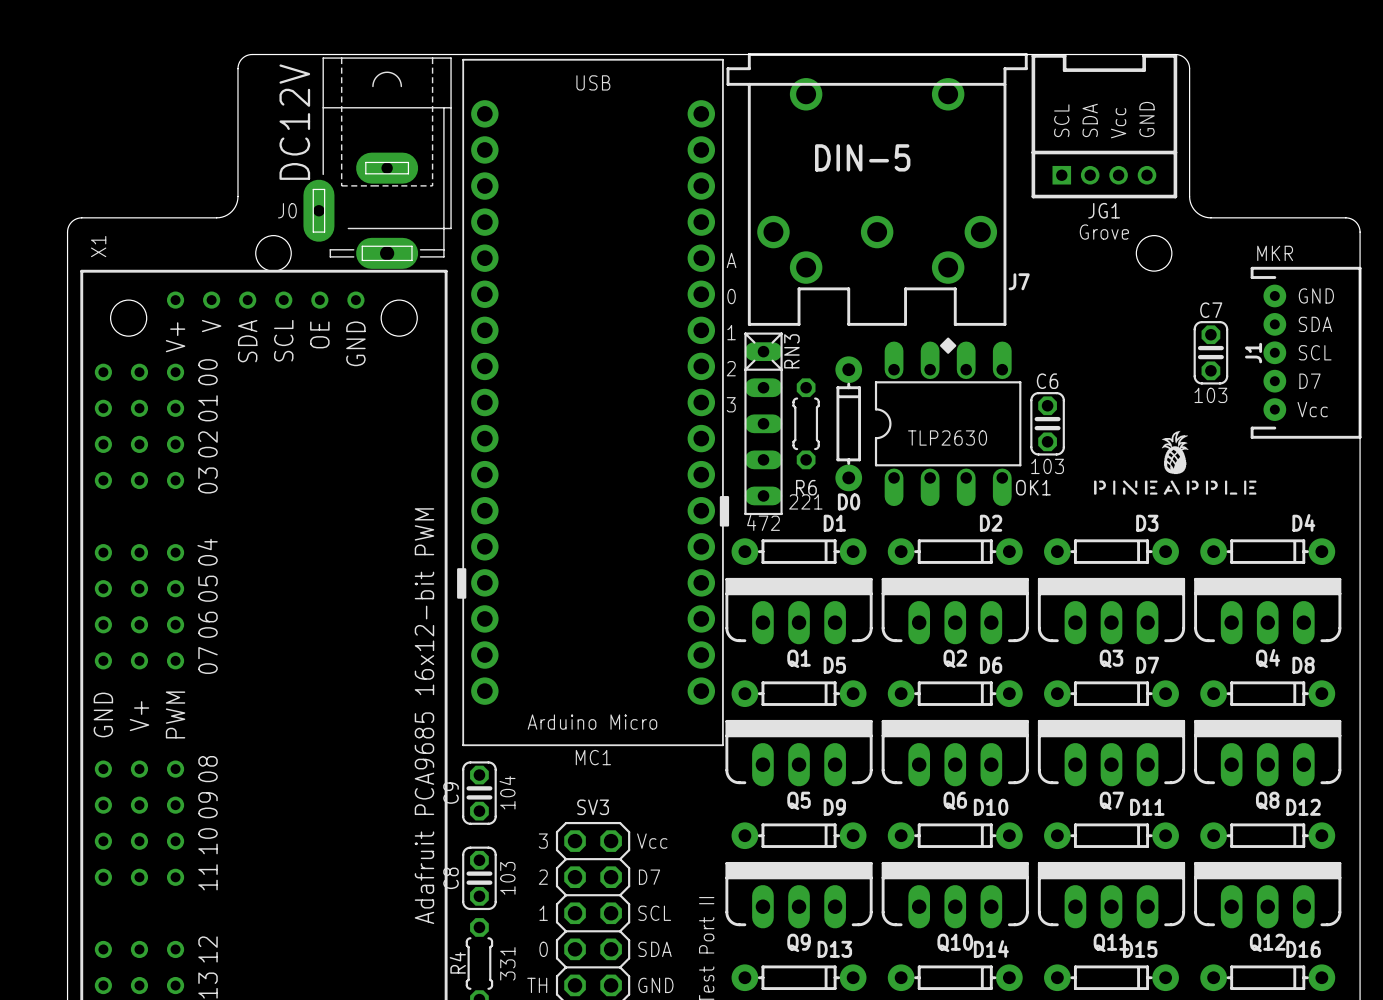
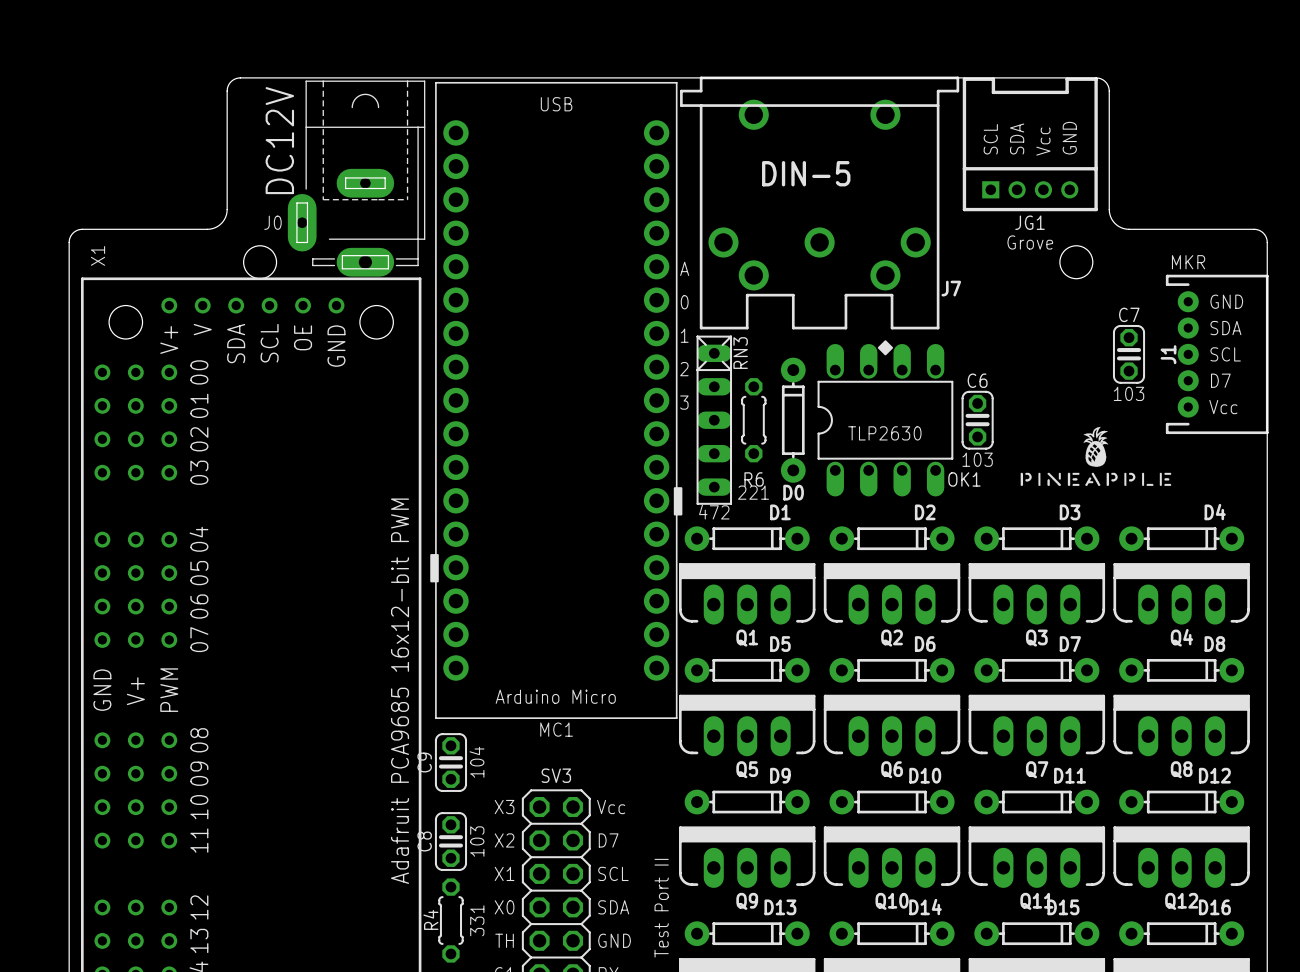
text: 3 (543, 841) -> X3 (504, 807)
text: 2 (543, 877) -> X2 (504, 840)
text: 1 (543, 913) -> X1 (504, 873)
text: 0 (543, 949) -> X0 (504, 907)

